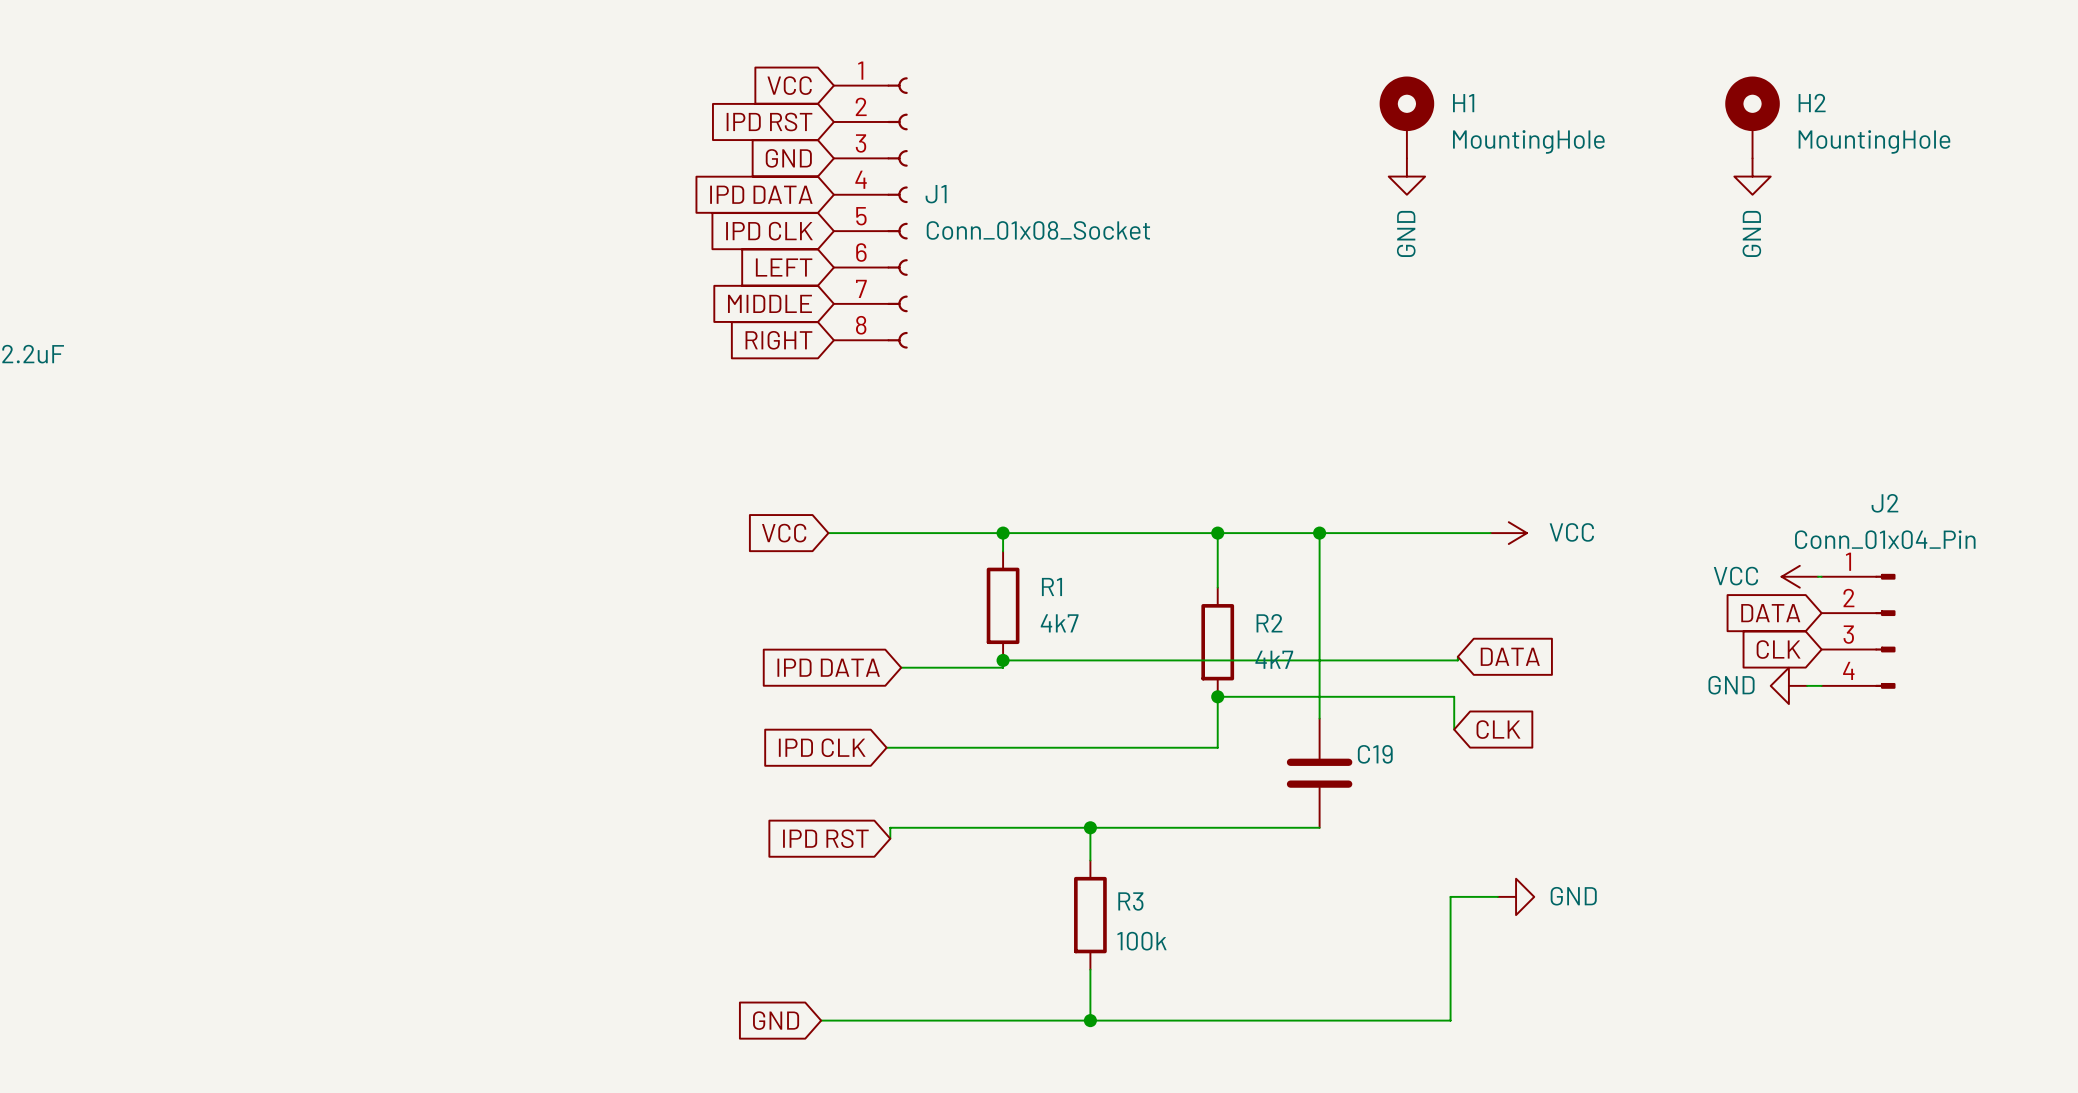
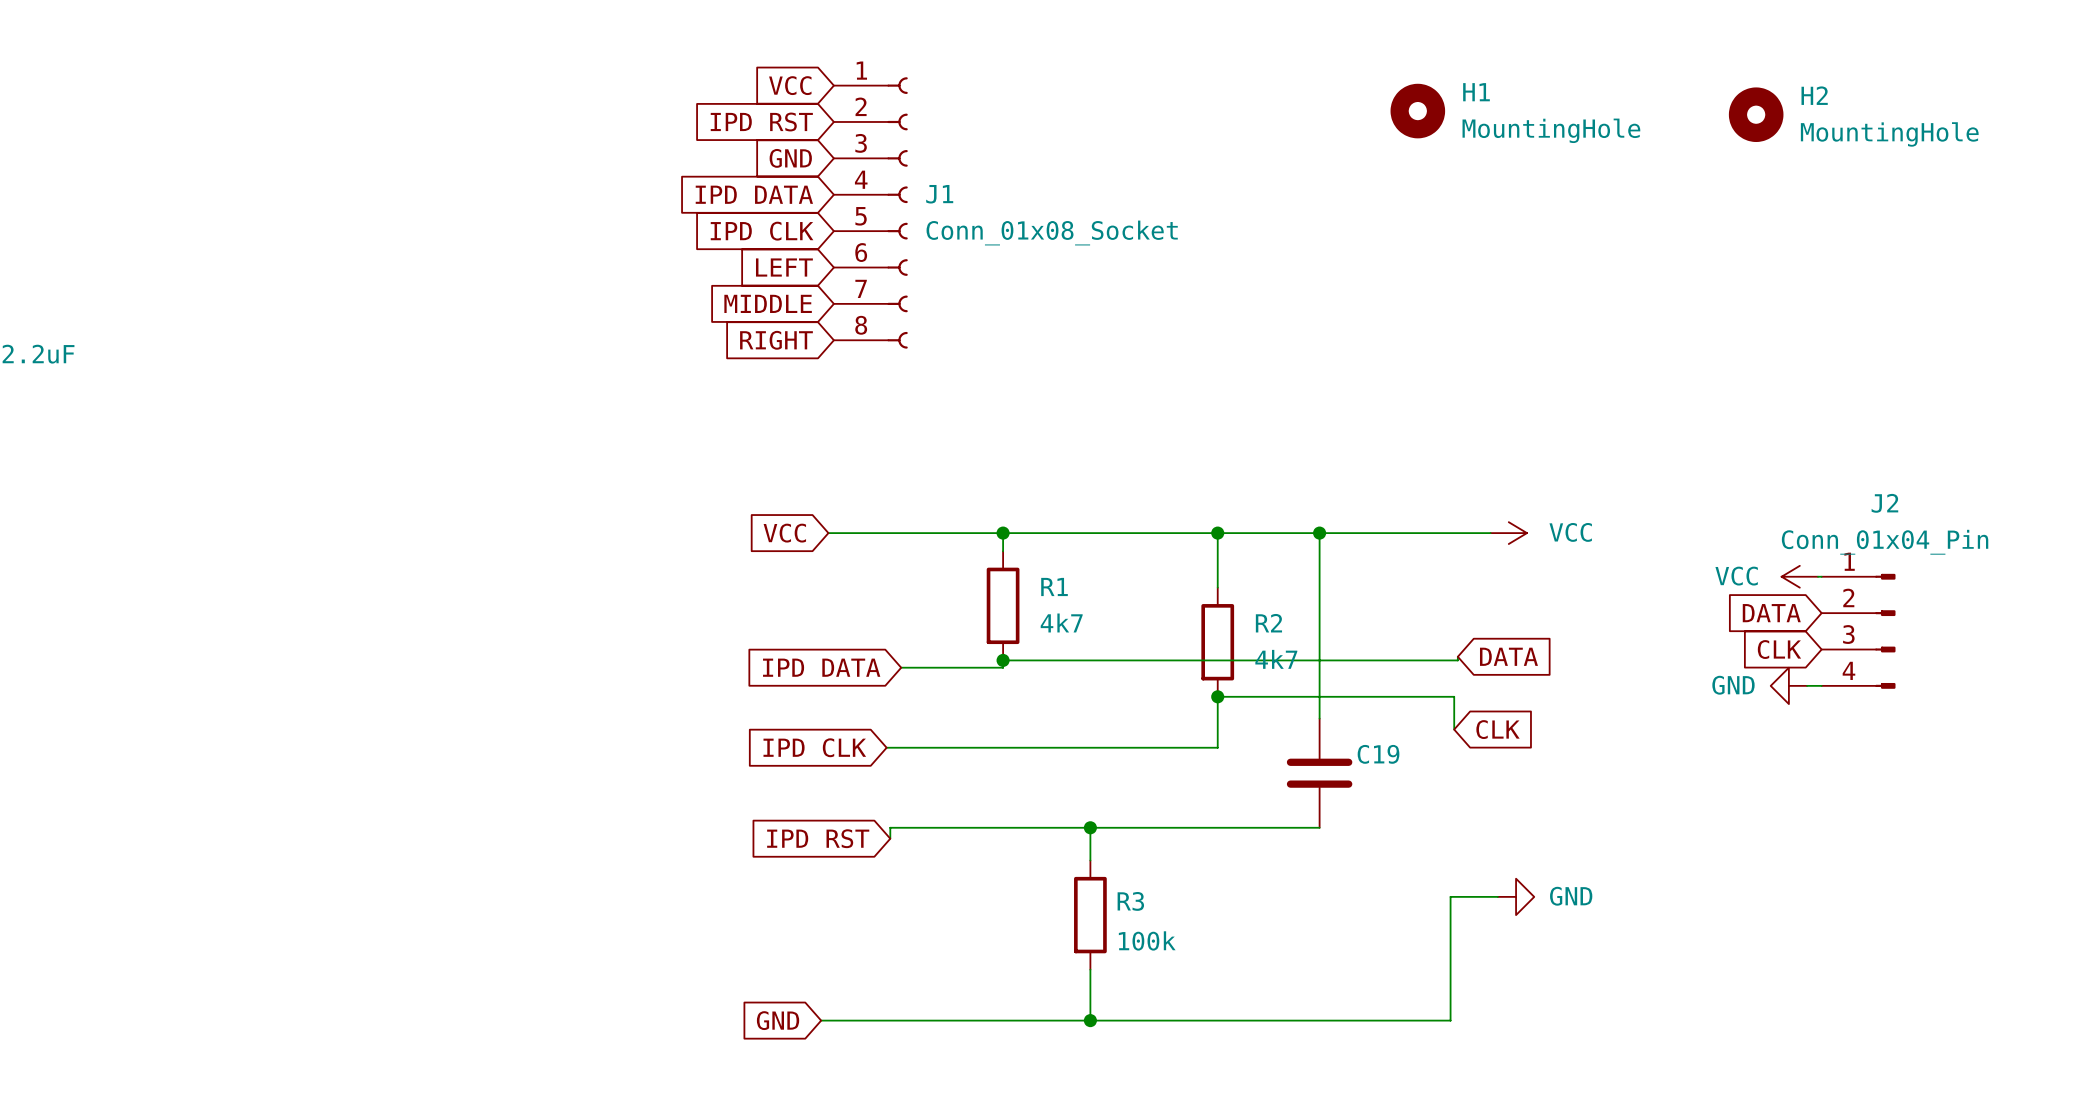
H1 symbol: [1379, 76, 1435, 159] -> [1390, 83, 1446, 139]
H2 symbol: [1725, 76, 1780, 159] -> [1728, 87, 1784, 143]
power symbol: GND (1406, 176) -> none
power symbol: GND (1752, 176) -> none

